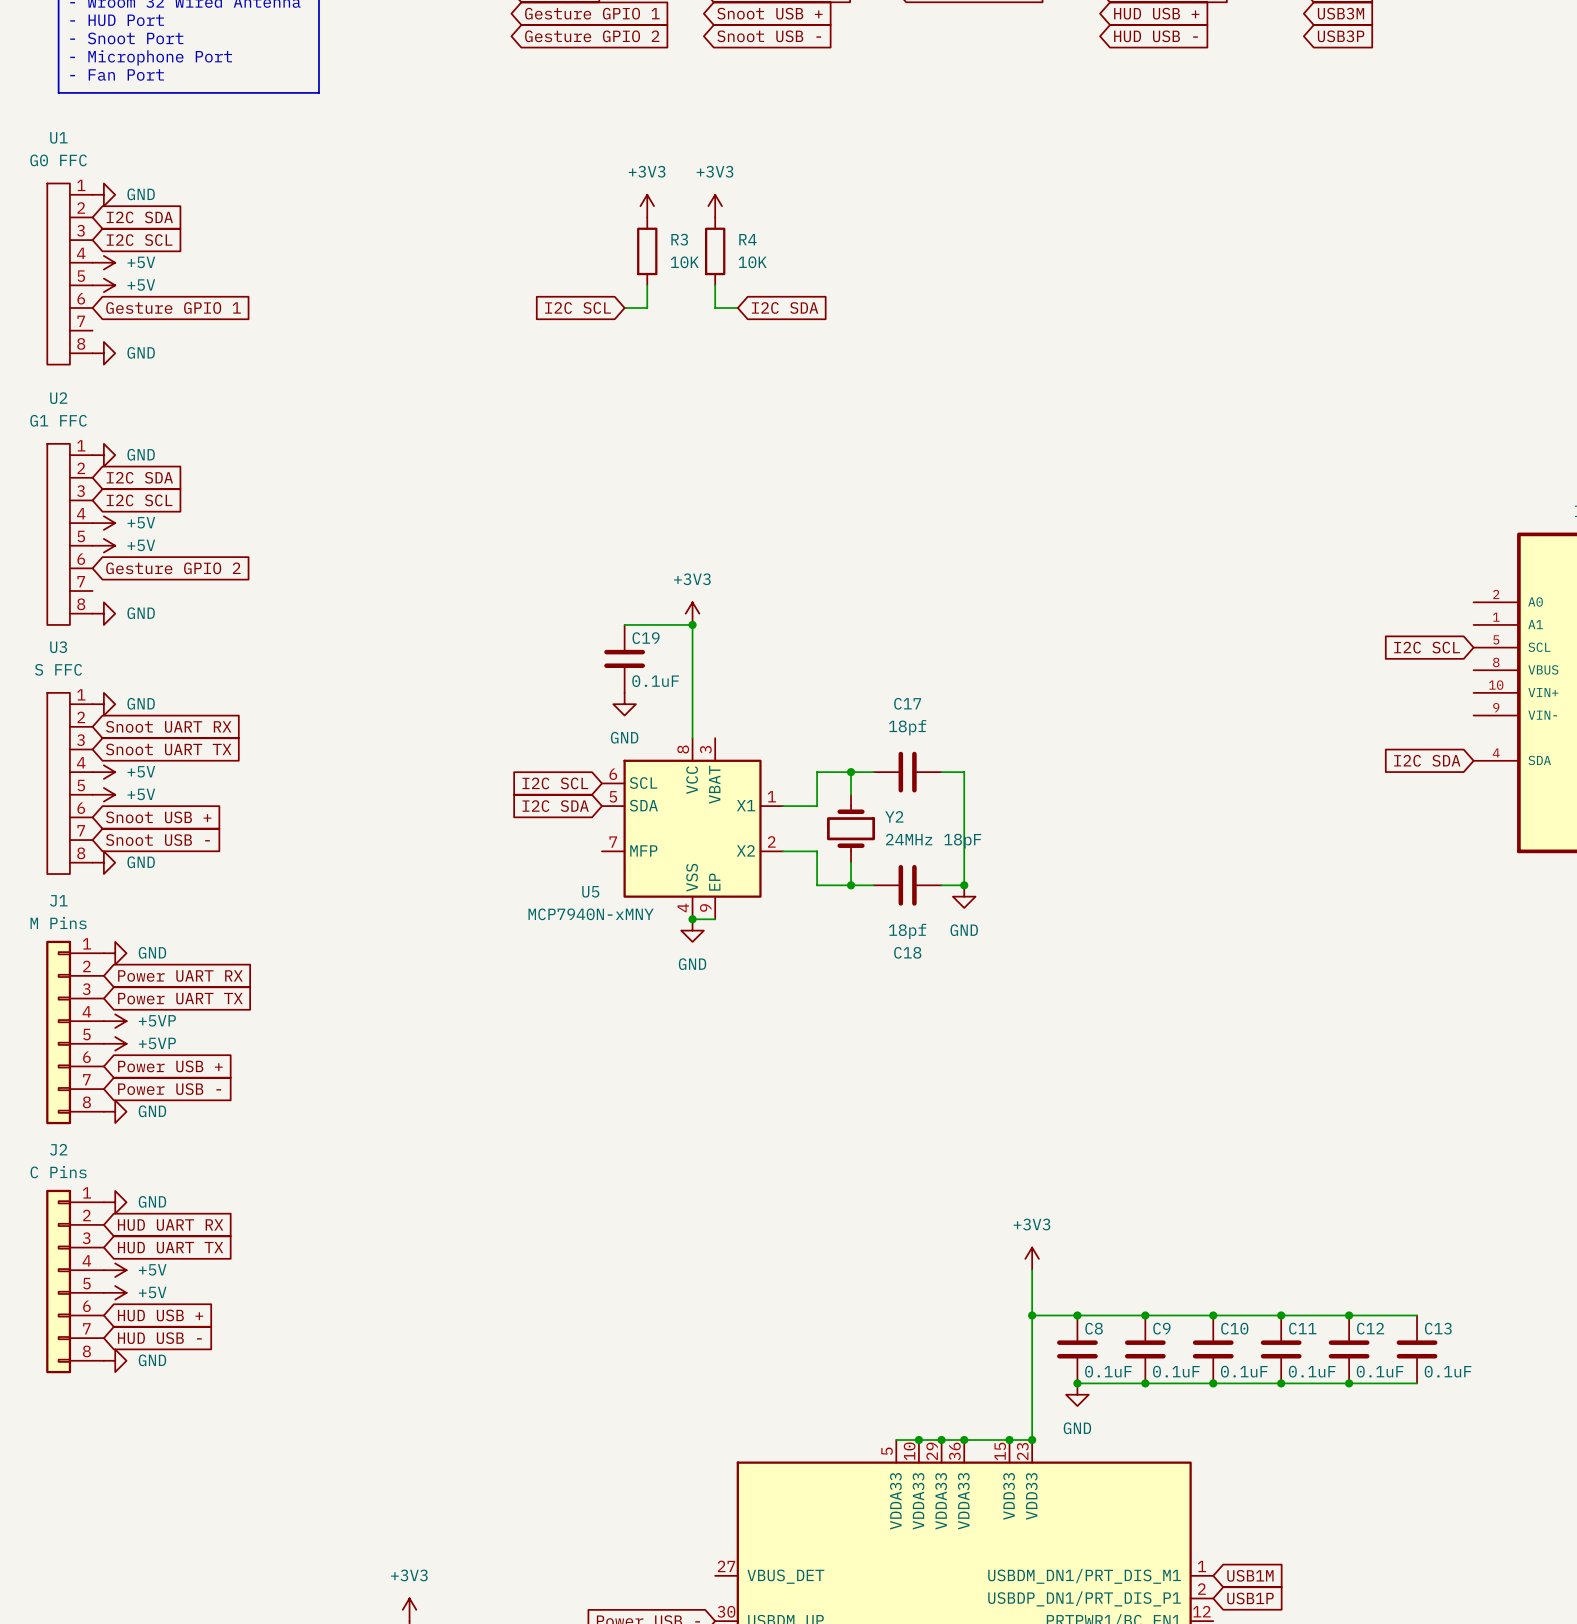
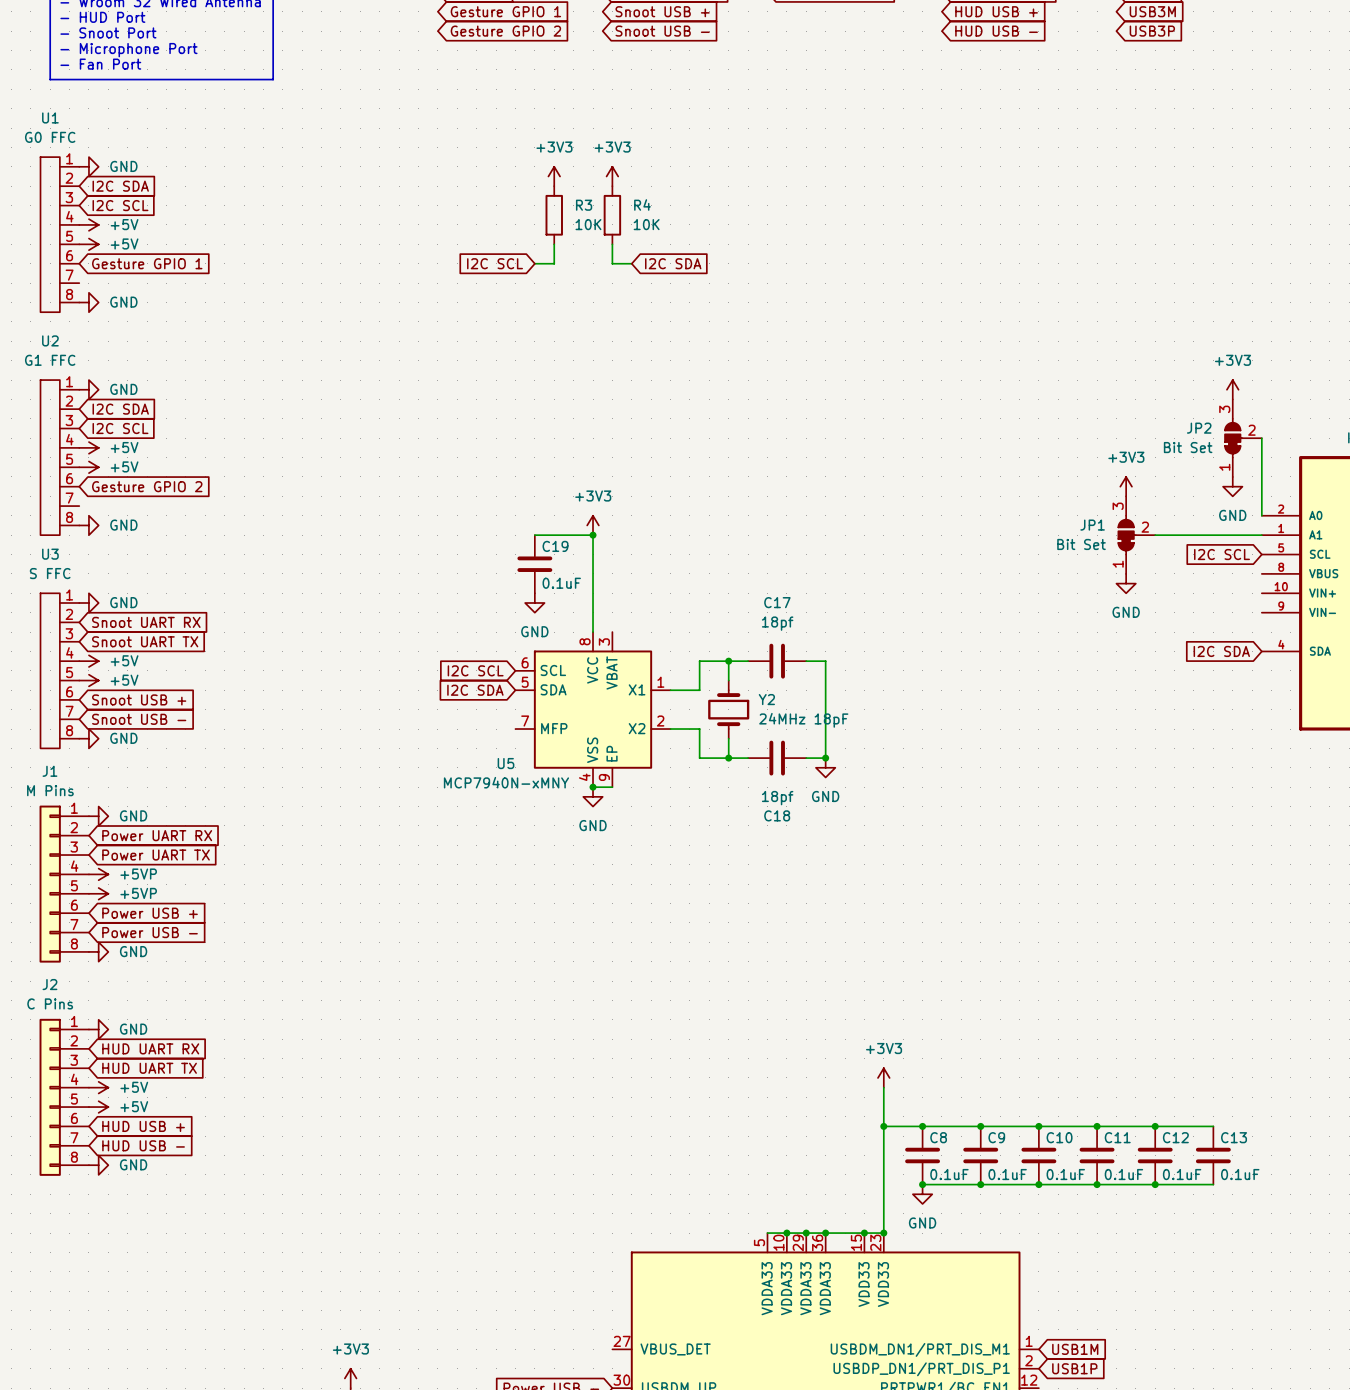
power symbol: none -> +3V3 (1232, 389)
JP2: none -> Bit Set (1243, 438)
wire: none -> (1261, 438) (1261, 515)
power symbol: none -> +3V3 (1126, 486)
power symbol: none -> GND (1232, 486)
JP1: none -> Bit Set (1136, 535)
wire: none -> (1155, 535) (1261, 535)
power symbol: none -> GND (1126, 583)

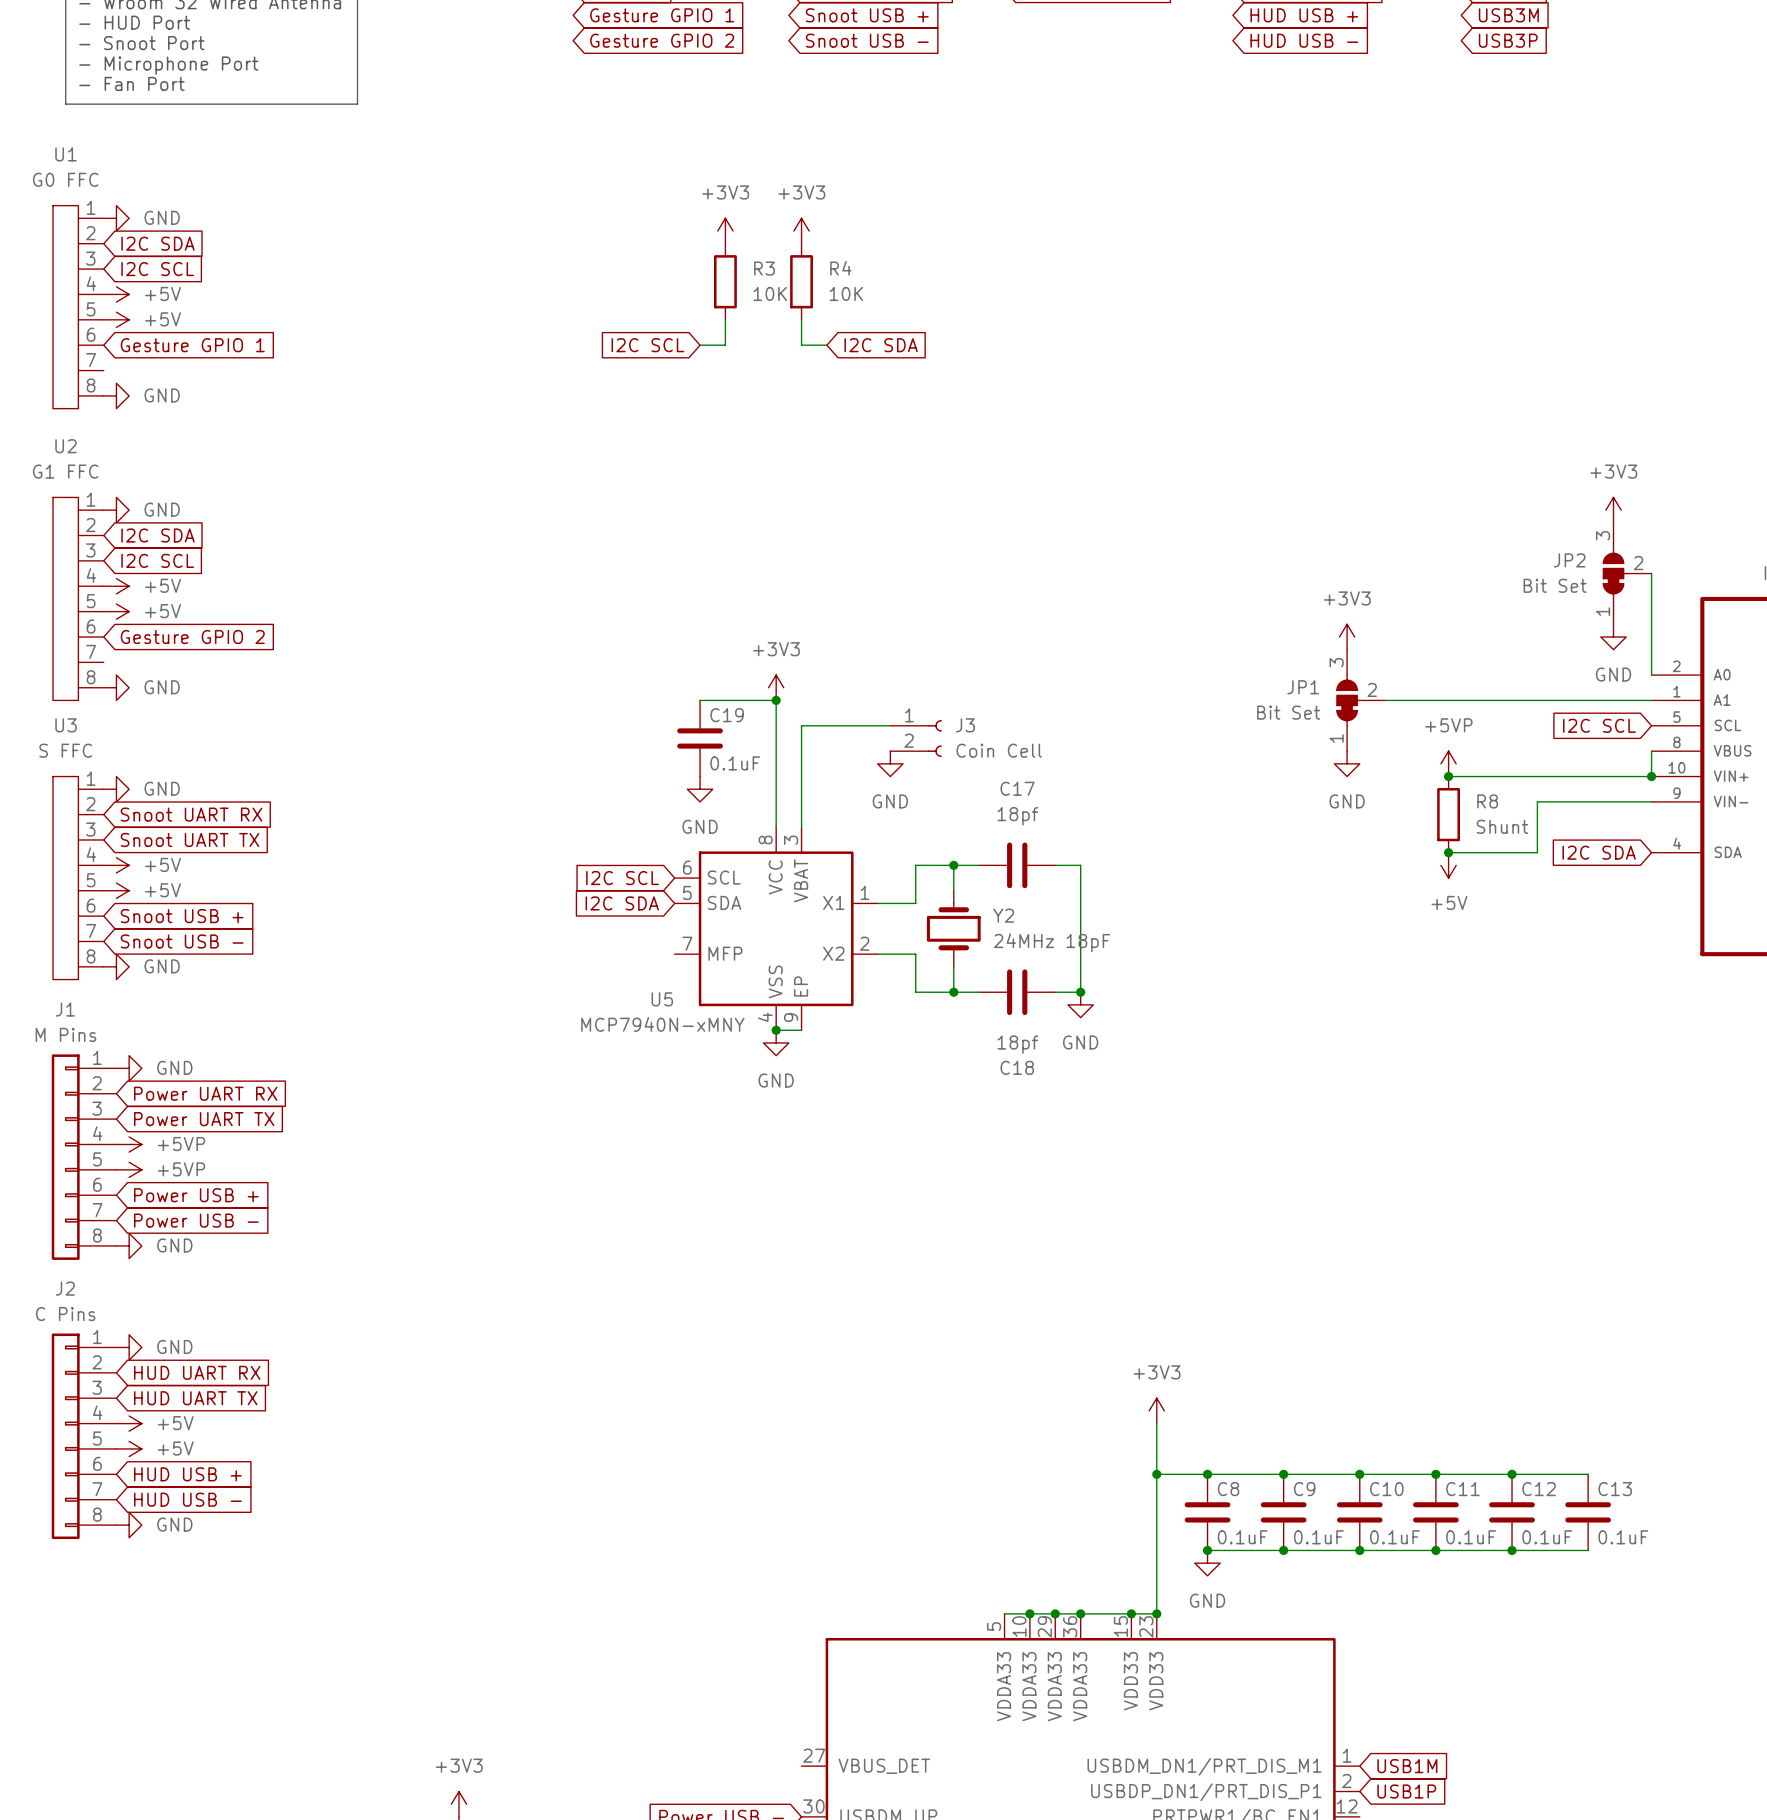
power symbol position: +3V3 (1126, 486) -> +3V3 (1347, 636)
wire: none -> (1385, 700) (1512, 700)
JP1 position: (1136, 535) -> (1361, 700)
wire: none -> (890, 725) (801, 725) (801, 827)
J3: none -> Coin Cell (916, 738)
wire: none -> (1651, 751) (1651, 776) (1448, 776)
power symbol: none -> GND (890, 763)
power symbol: none -> +5VP (1448, 763)
power symbol position: GND (1126, 583) -> GND (1347, 763)
junction: none -> (1448, 776)
junction: none -> (1651, 776)
wire: none -> (1651, 801) (1537, 801) (1537, 852) (1448, 852)
R8: none -> Shunt (1448, 814)
junction: none -> (1448, 852)
power symbol: none -> +5V (1448, 865)

